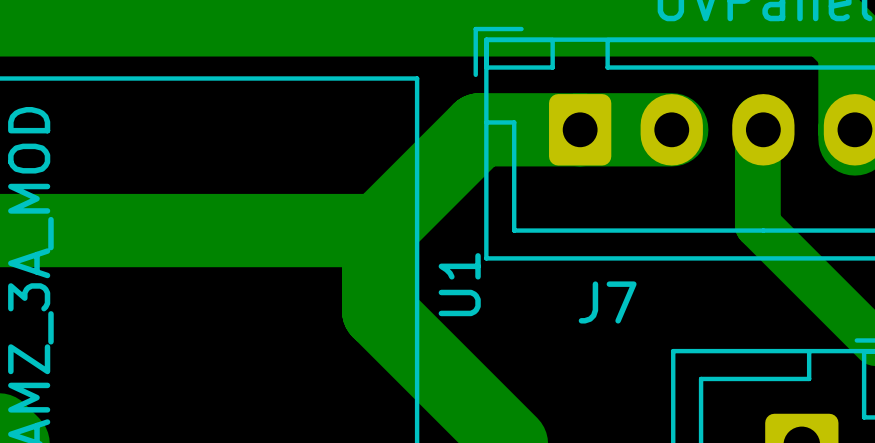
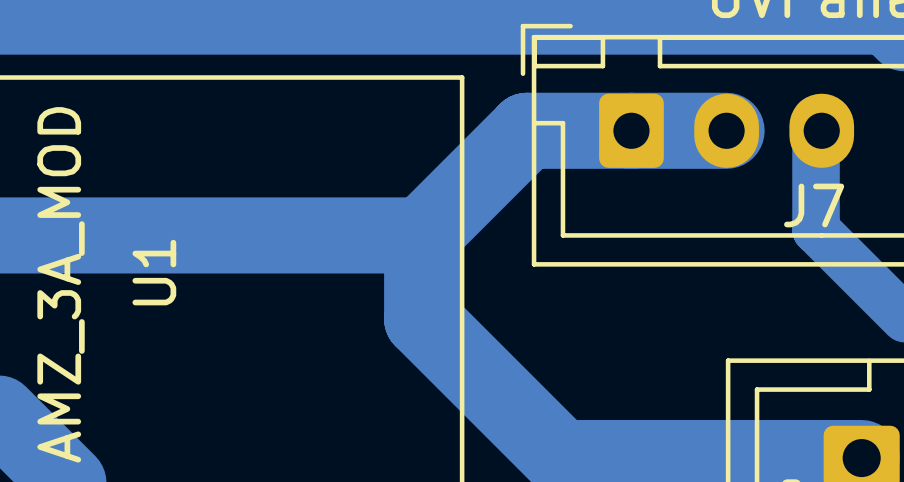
U1 name position: U1 (459, 284) -> U1 (154, 272)
J7 name position: J7 (607, 302) -> J7 (814, 205)

